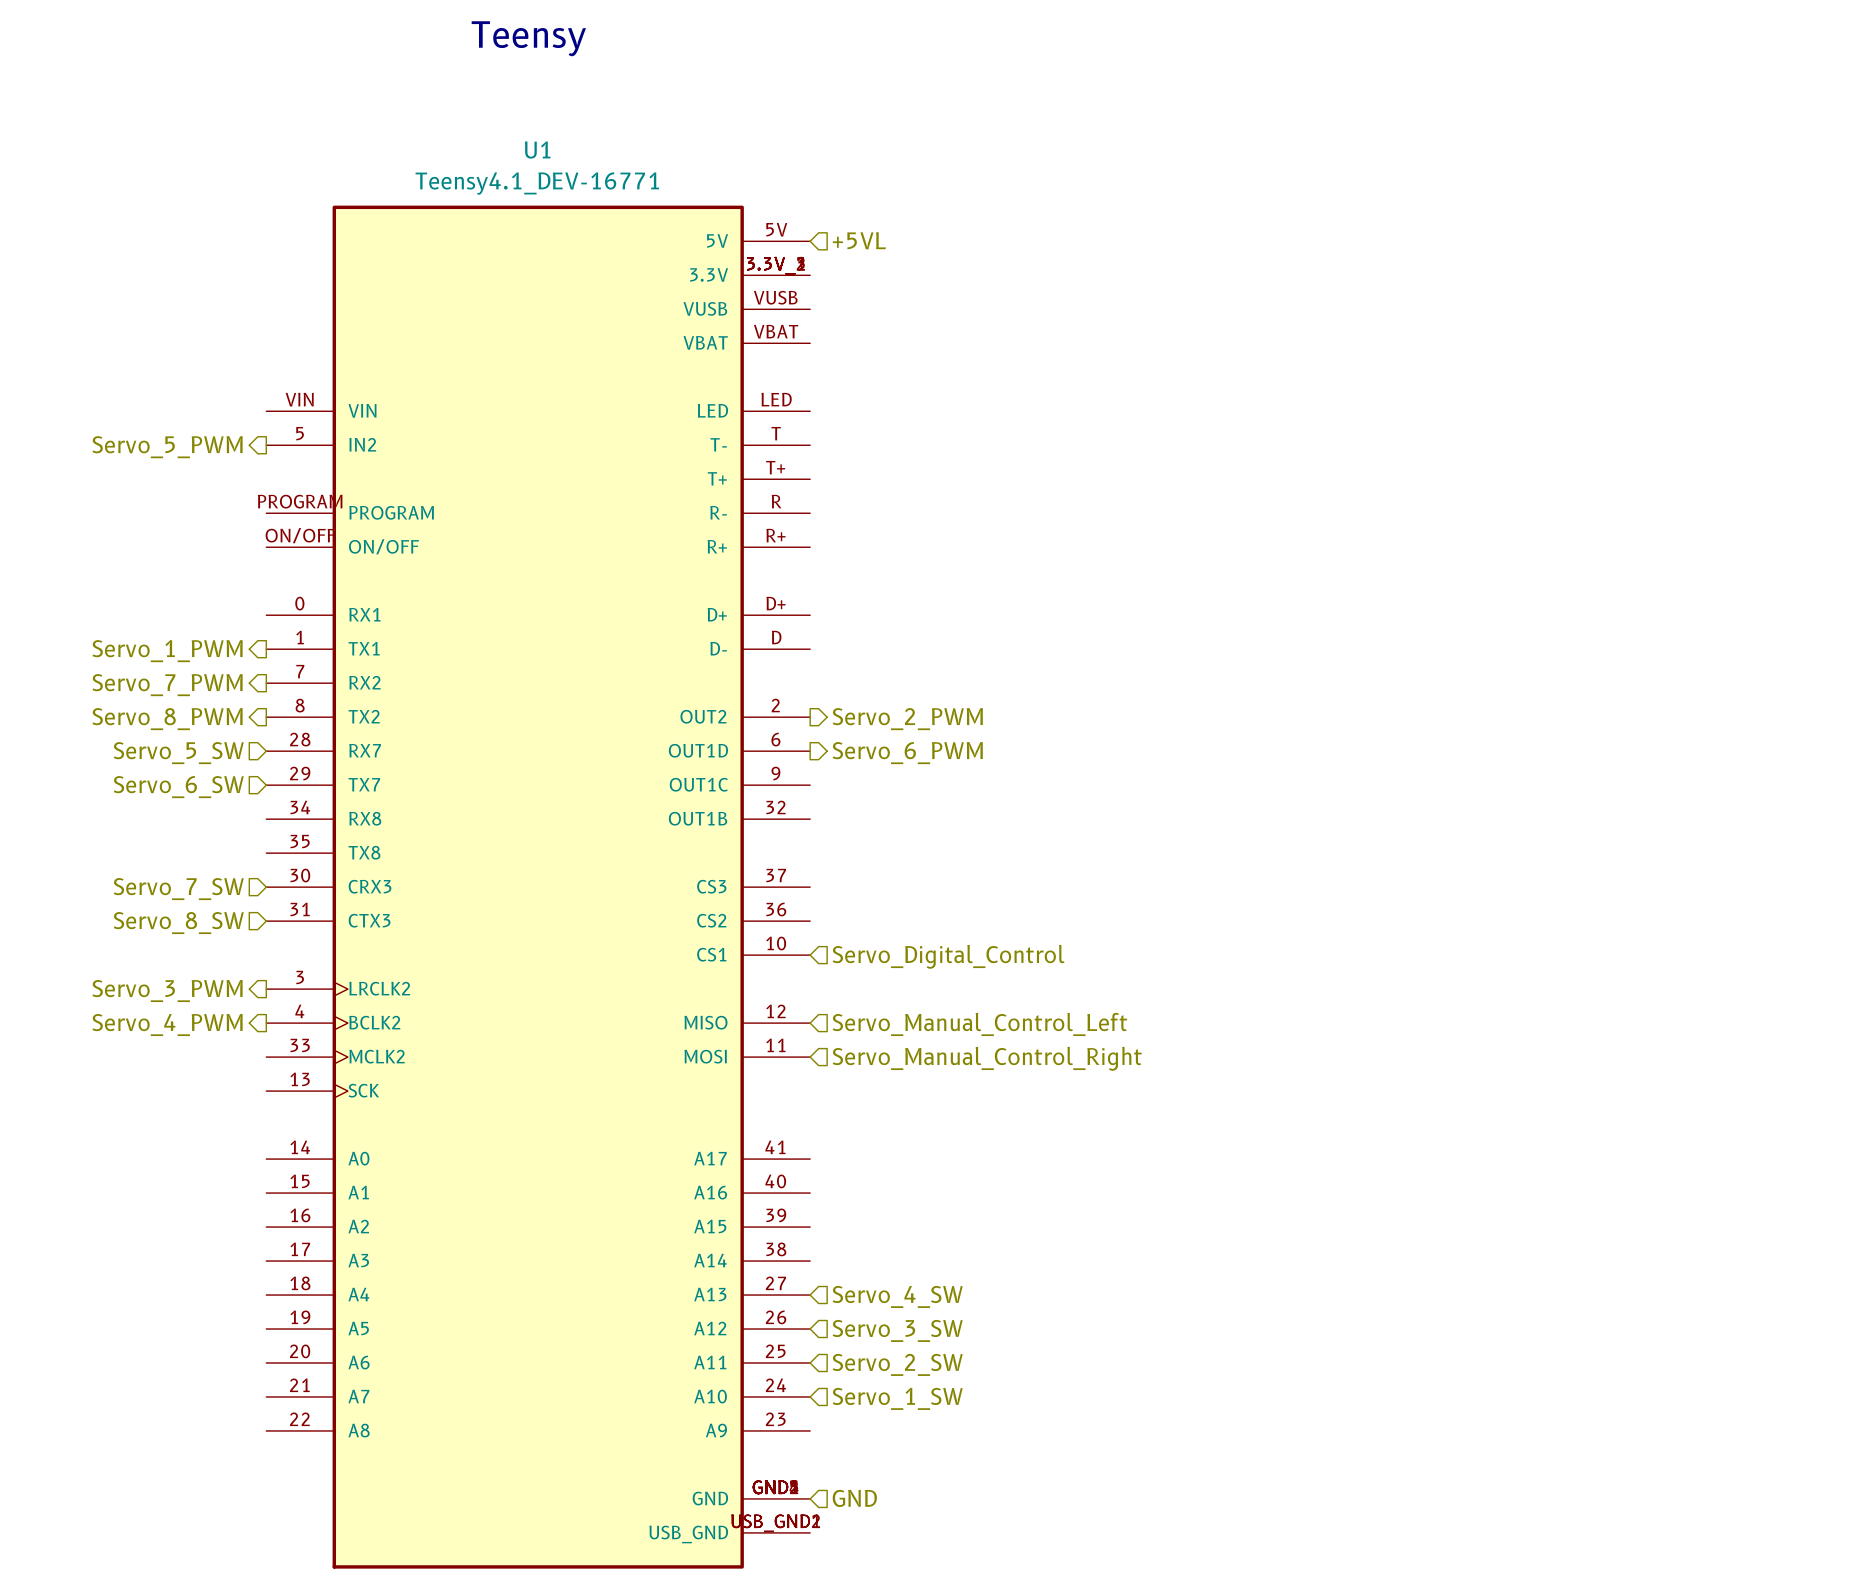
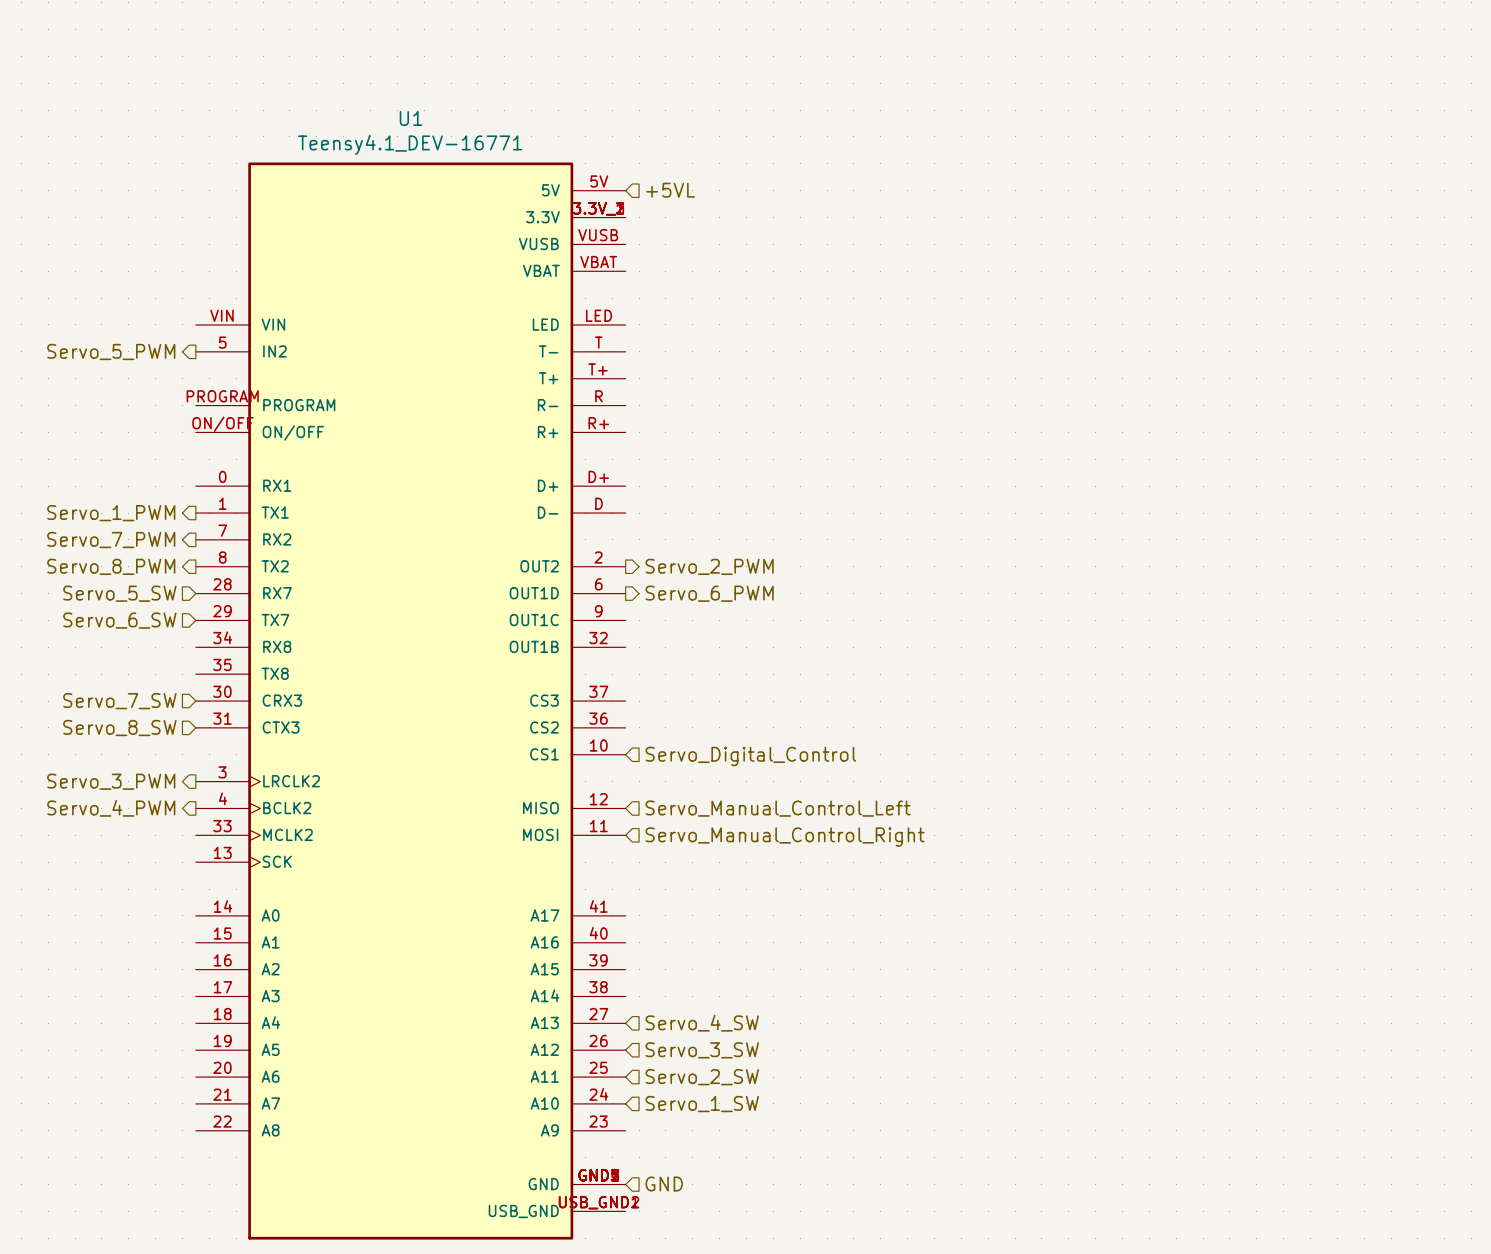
text: Teensy (528, 38) -> none

